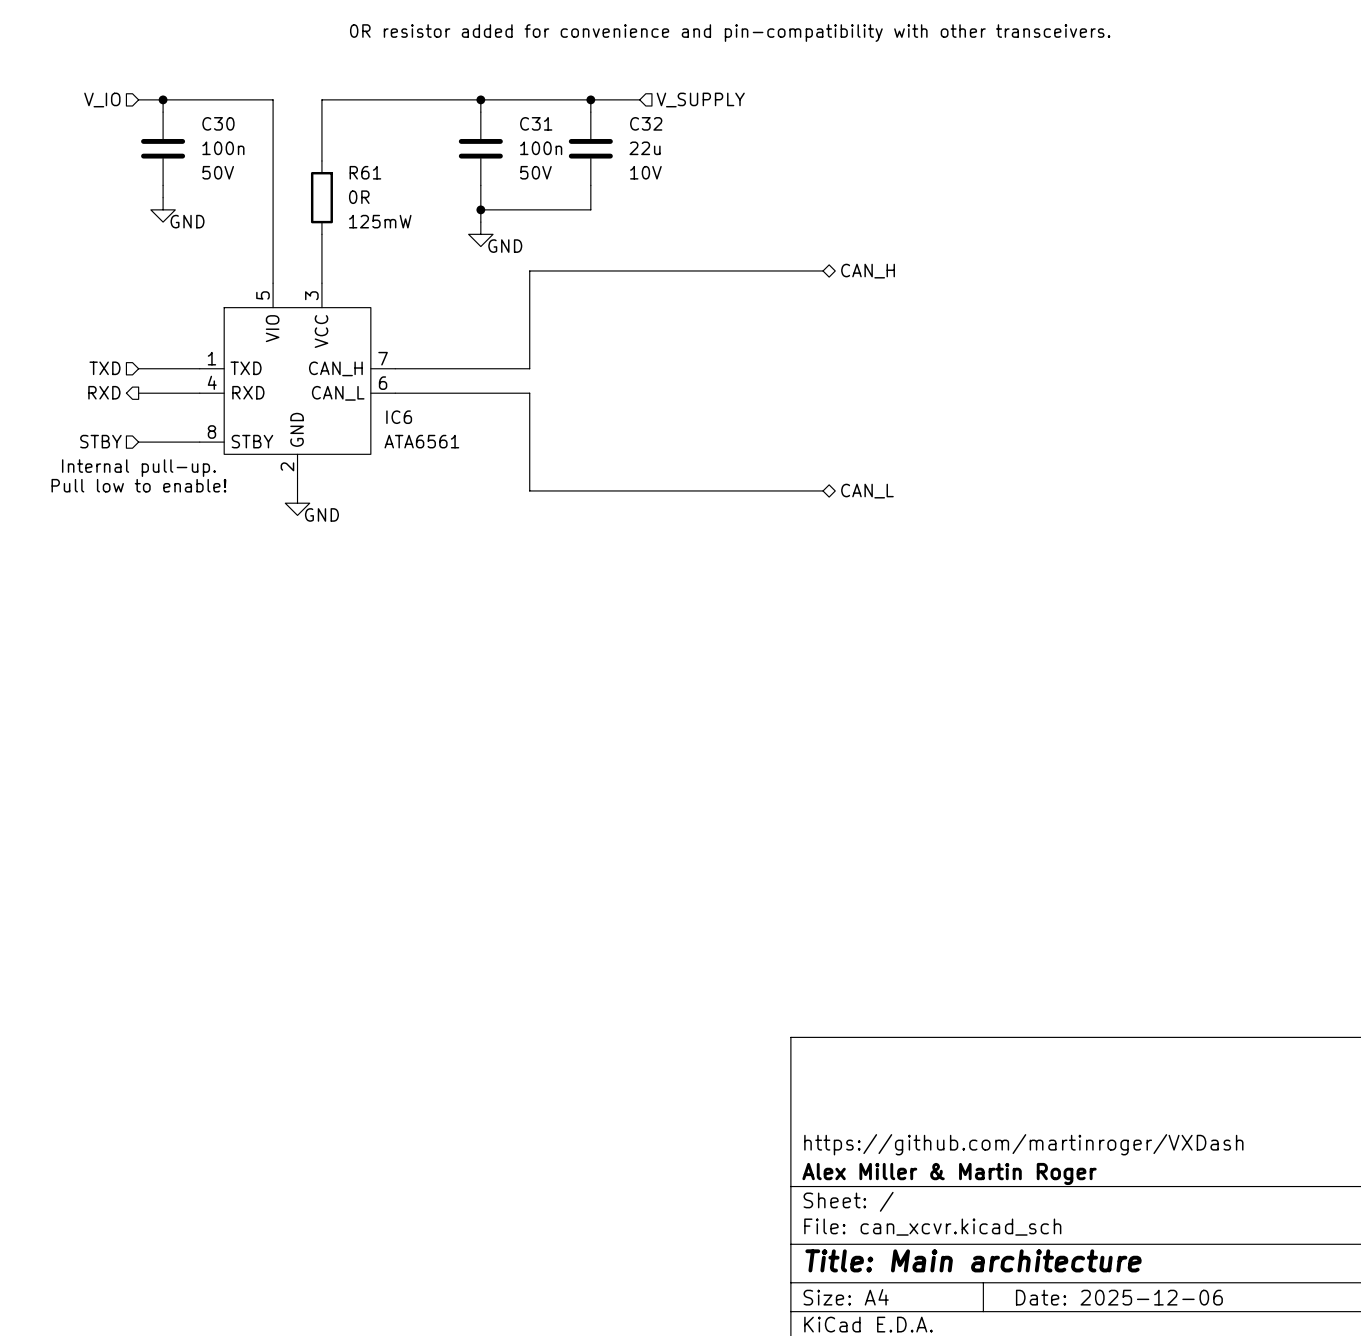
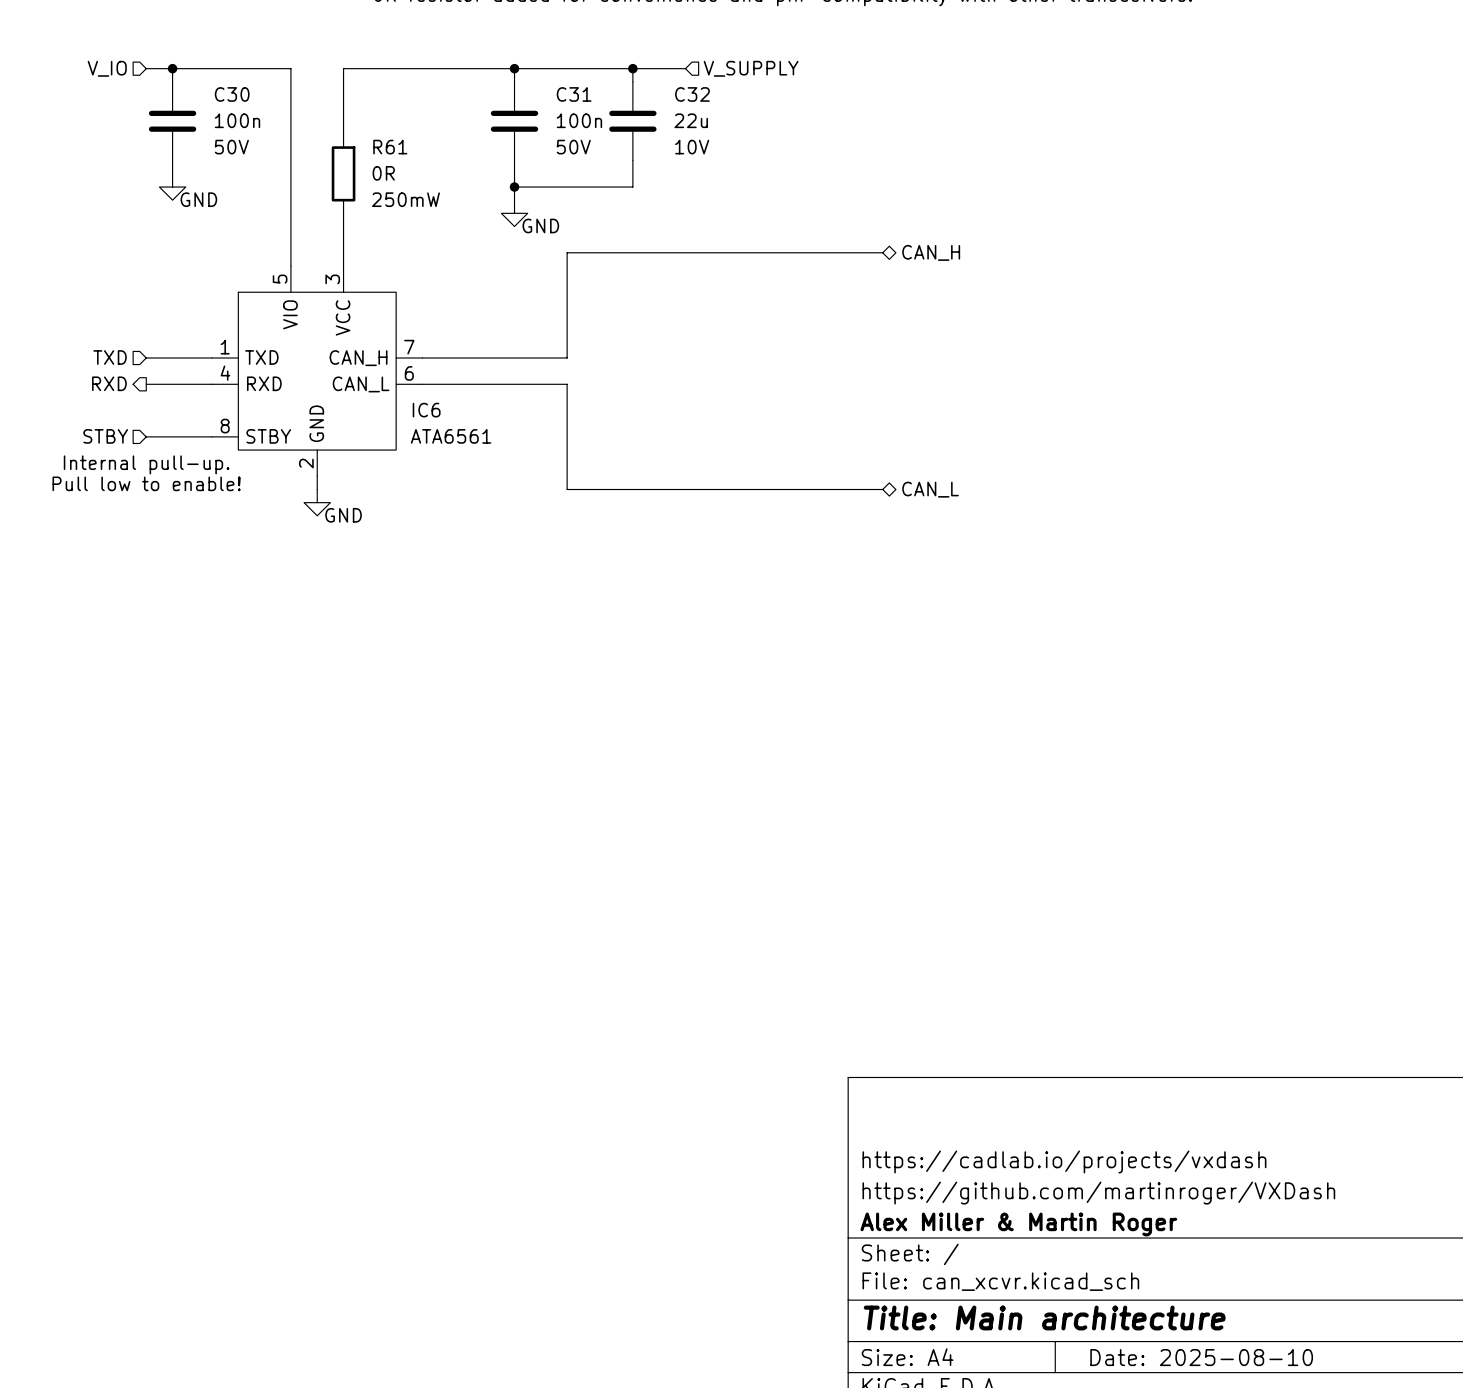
R61 text: 125mW (380, 221) -> 250mW (405, 199)
title block: none -> https://cadlab.io/projects/vxdash (1064, 1161)
title block: Date: 2025-12-06 (1119, 1297) -> Date: 2025-08-10 (1201, 1357)

